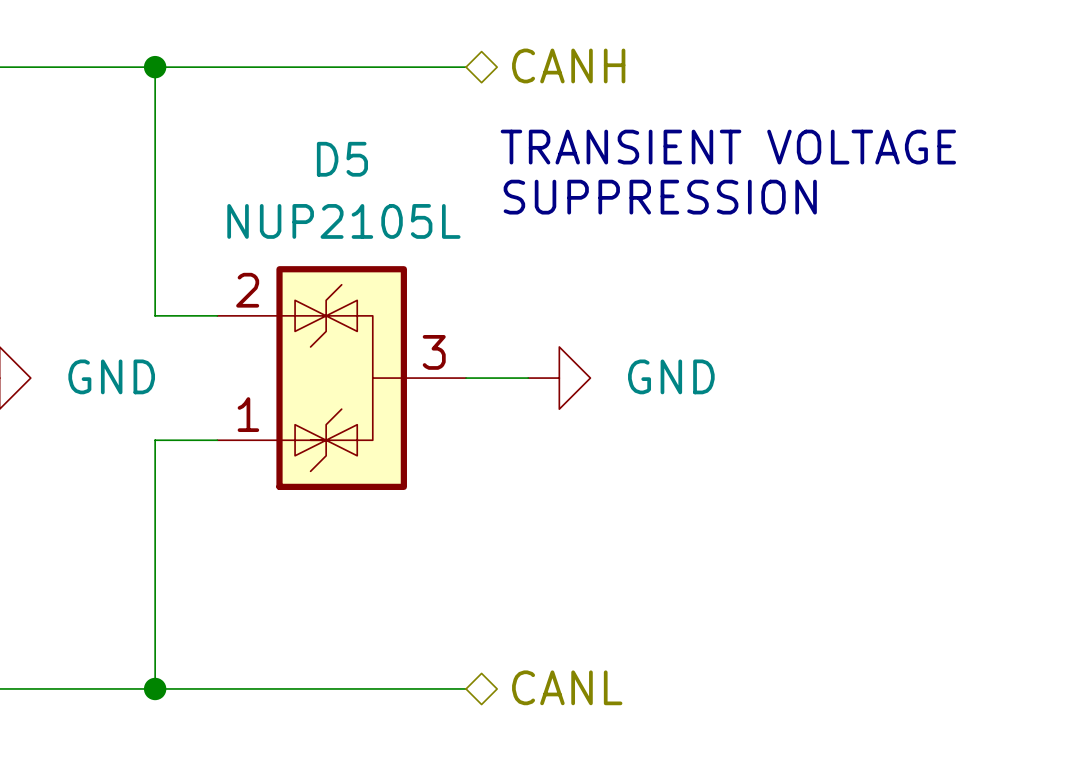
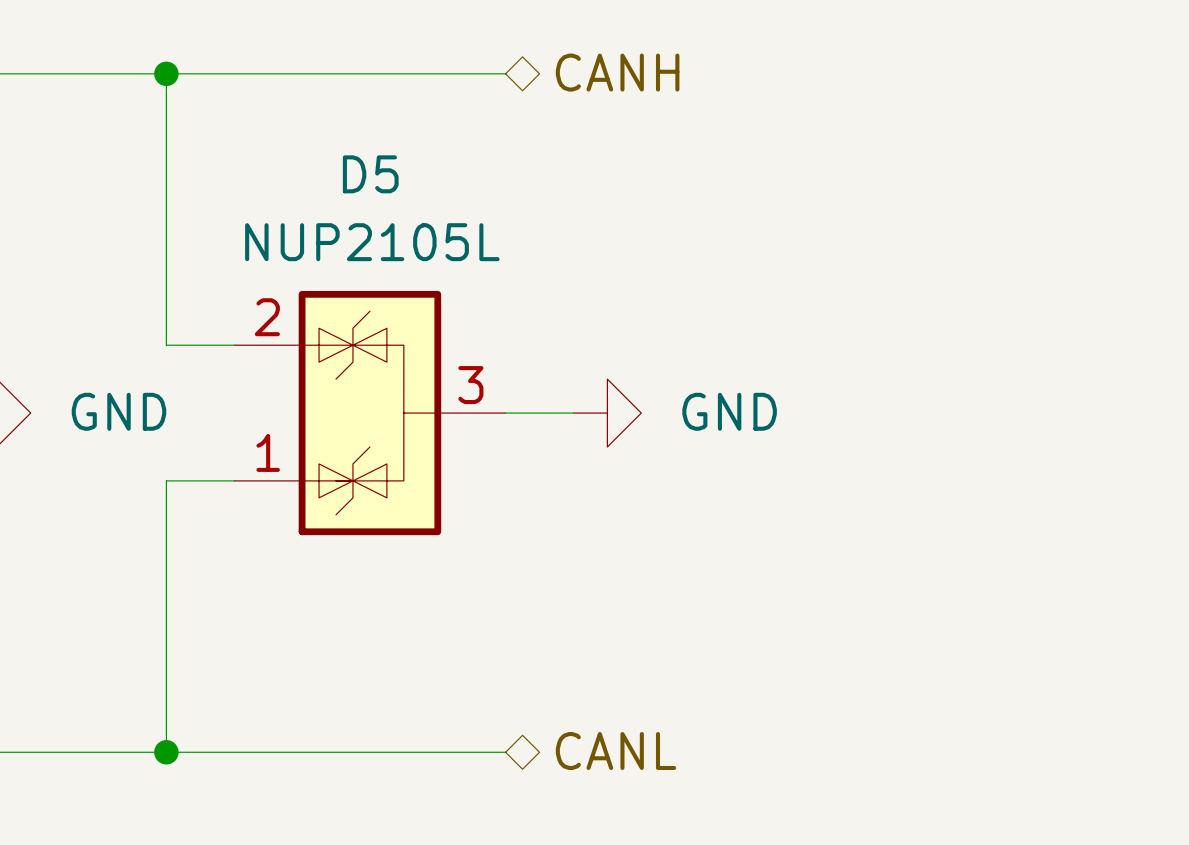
text: TRANSIENT VOLTAGE (728, 147) -> none
text: SUPPRESSION (660, 197) -> none

